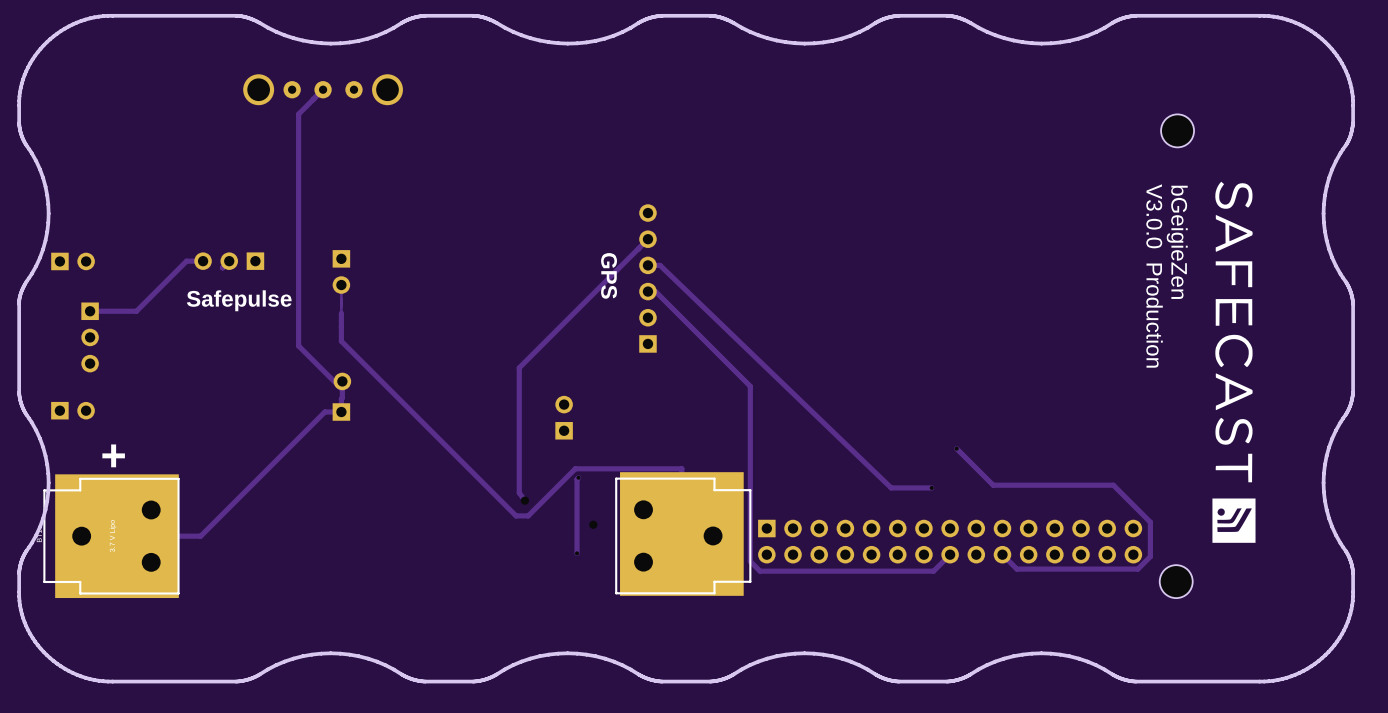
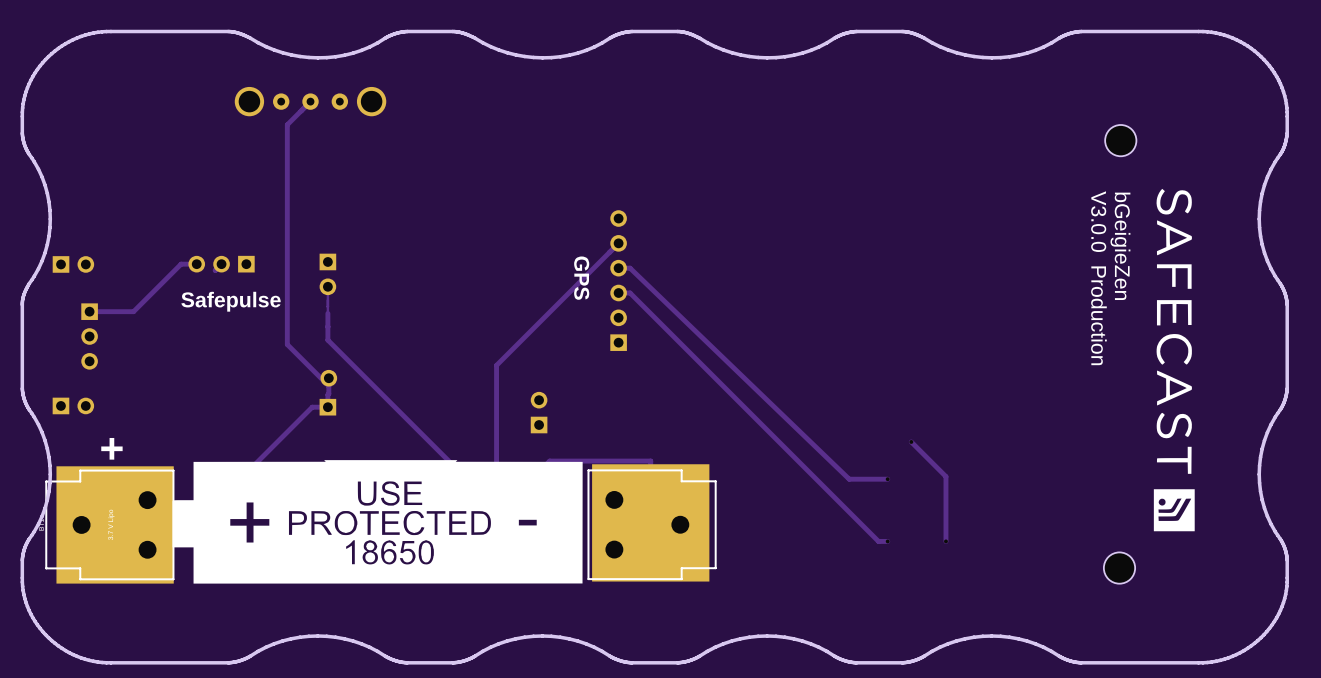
track: (655, 291) (750, 386) (750, 561) (760, 571) (933, 571) (950, 554) -> (625, 293) (630, 293) (878, 541) (887, 541)
drawing: none -> [172, 460, 583, 584]
track: (993, 485) (1113, 485) (1150, 522) (1150, 556) (1137, 569) (1016, 569) (1002, 554) -> (945, 476) (945, 541)
part: (950, 541) -> none
via: none -> (887, 541)
via: none -> (945, 541)

